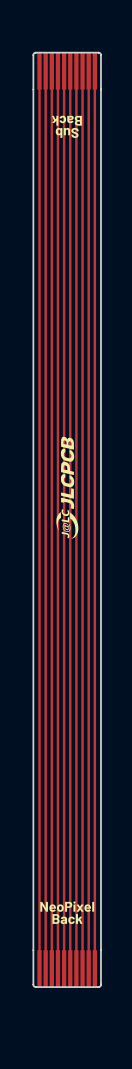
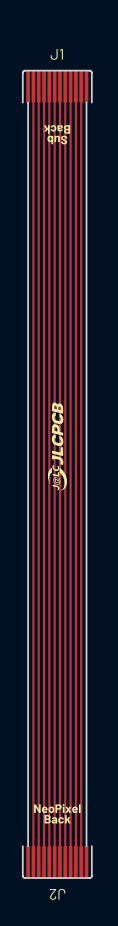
part: (67, 71) -> none
J1: none -> (57, 86)
part: (67, 968) -> none
J2: none -> (57, 862)

